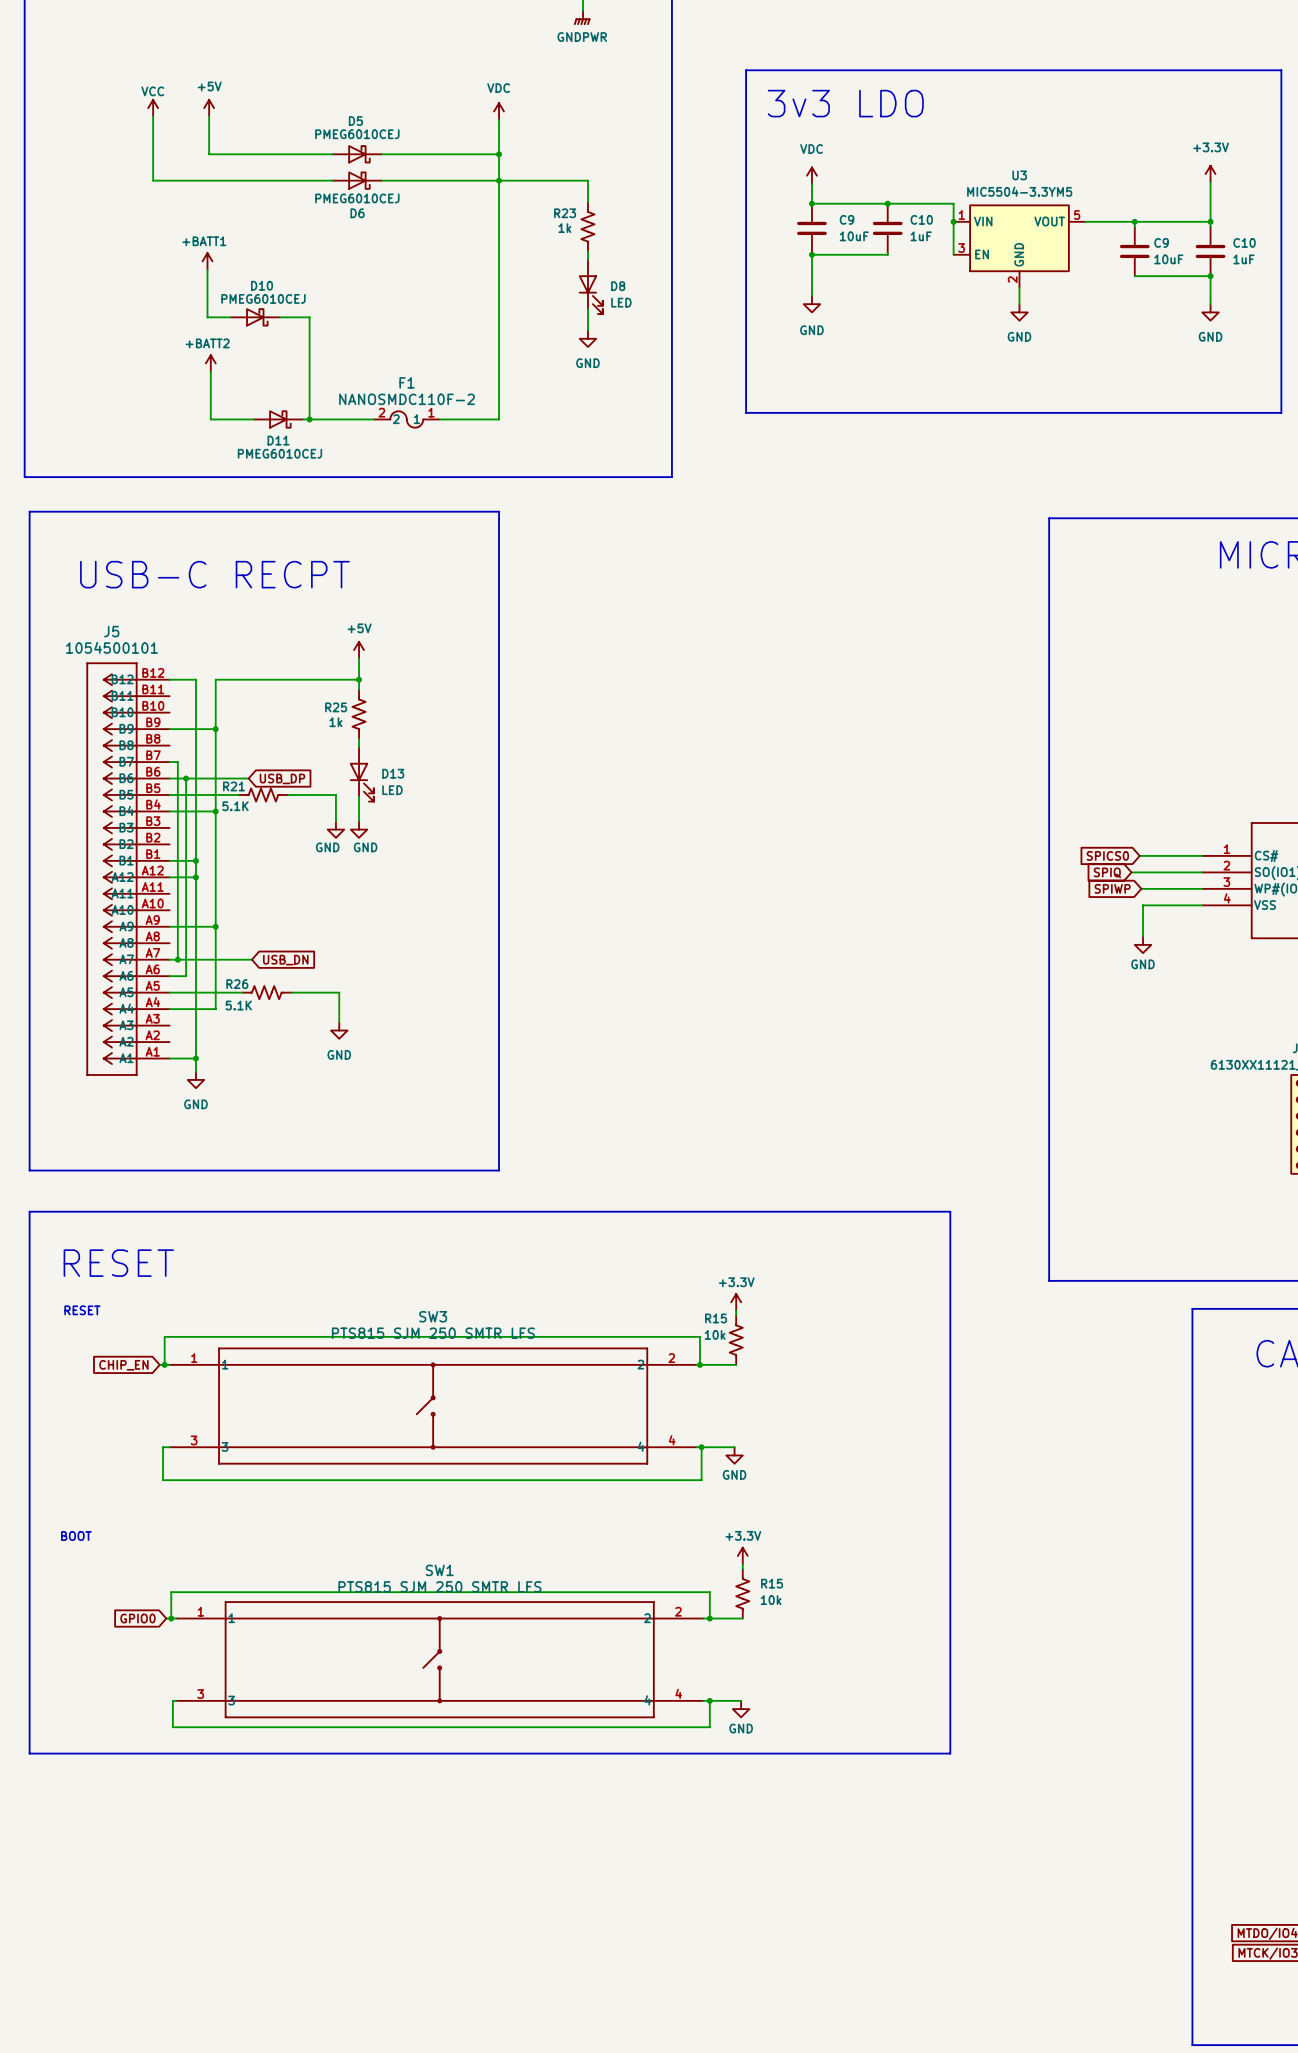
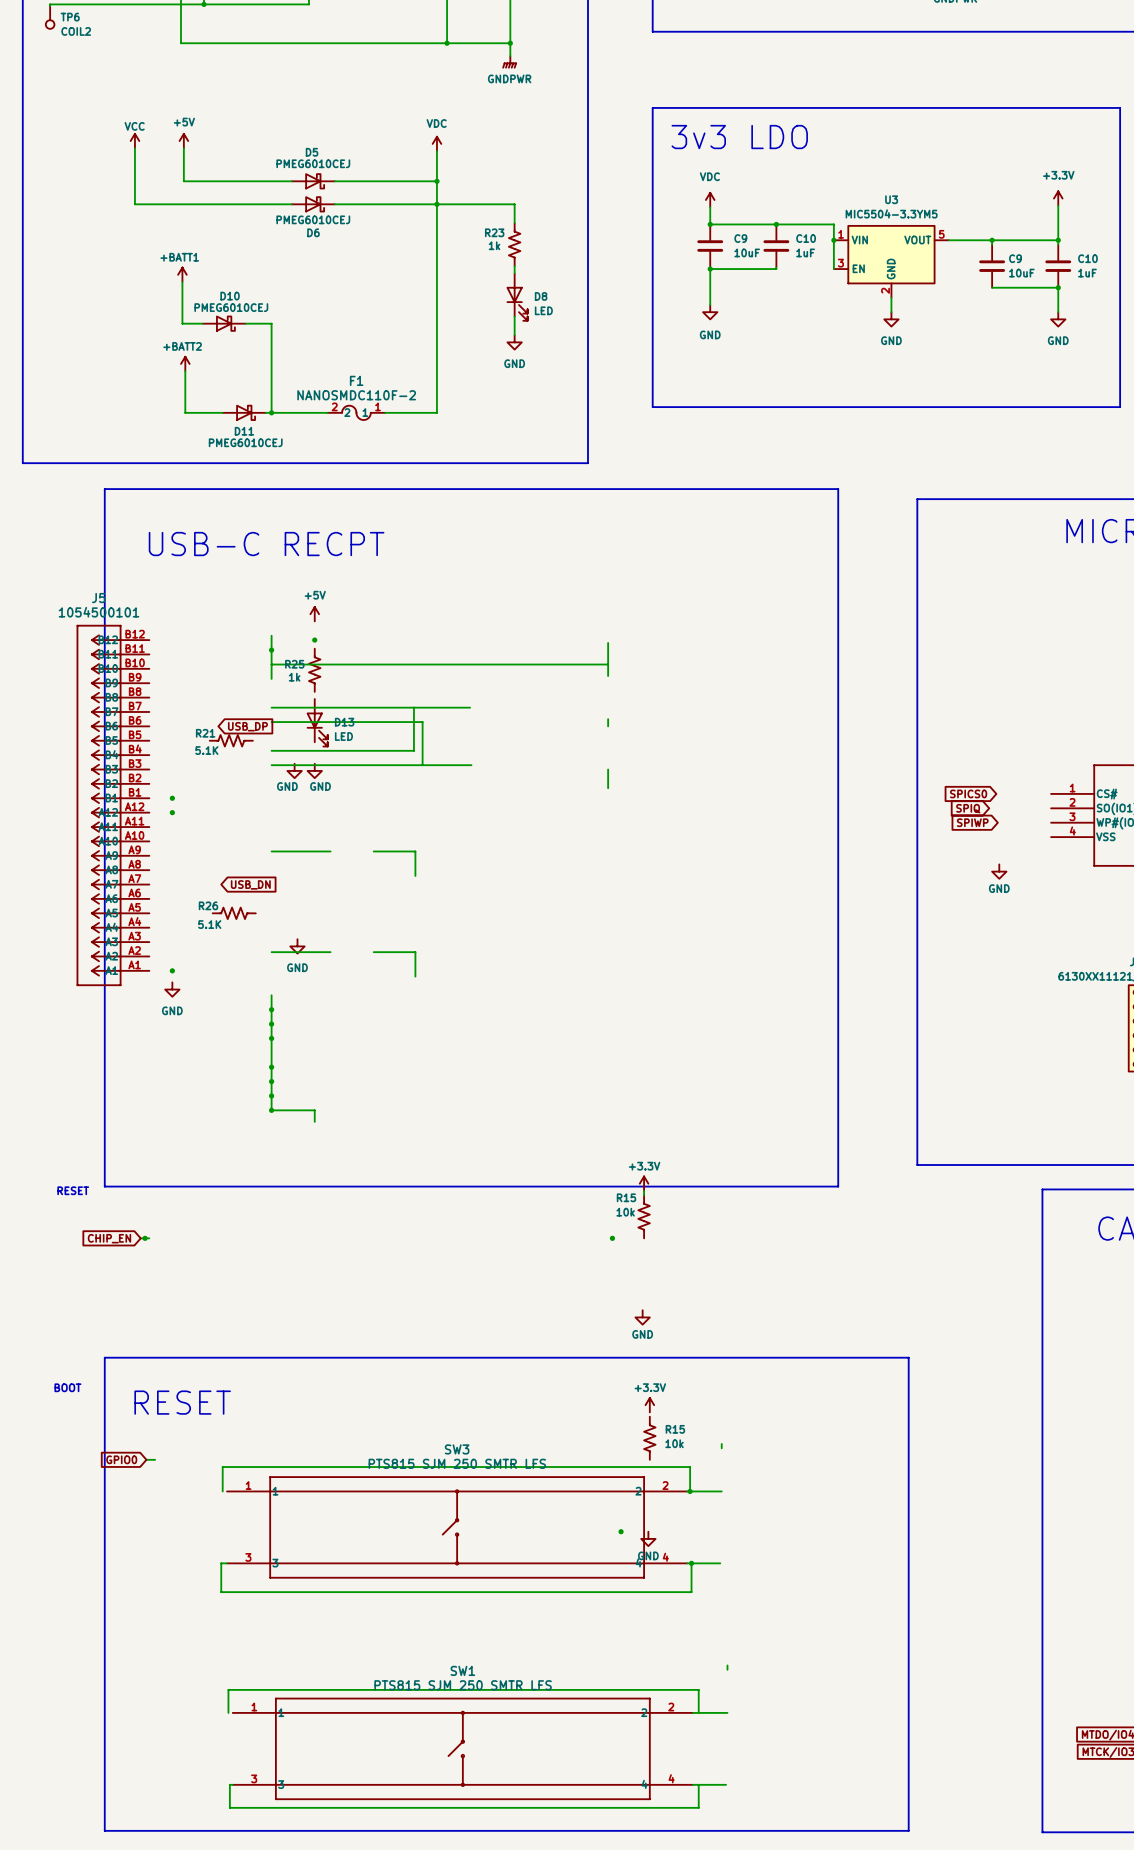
line: none -> (104, 489) (104, 1186) (838, 1186) (838, 489) (104, 489)
line: (29, 511) (29, 1170) (499, 1170) (499, 511) (29, 511) -> none
text position: USB-C RECPT (214, 574) -> USB-C RECPT (266, 544)
wire: (359, 658) (359, 689) -> none
wire: none -> (271, 635) (271, 678)
wire: (169, 679) (195, 679) (195, 1071) -> none
wire: (359, 679) (215, 679) (215, 1009) (169, 1009) -> none
wire: none -> (608, 642) (608, 676)
junction: none -> (271, 650)
wire: none -> (271, 664) (608, 664)
wire: (169, 729) (215, 729) -> none
junction: (215, 729) -> none
wire: (359, 739) (359, 747) -> none
wire: none -> (271, 707) (470, 707)
wire: none -> (413, 707) (413, 750) (271, 750)
wire: (169, 762) (177, 762) (177, 959) -> none
wire: none -> (608, 719) (608, 726)
wire: none -> (271, 722) (422, 722) (422, 765)
wire: (169, 778) (248, 778) -> none
wire: (186, 778) (186, 976) (169, 976) -> none
junction: (186, 778) -> none
wire: (169, 795) (238, 795) -> none
wire: (288, 795) (335, 795) (335, 821) -> none
wire: (359, 796) (359, 821) -> none
wire: (169, 811) (215, 811) -> none
junction: (215, 811) -> none
wire: none -> (271, 765) (471, 765)
wire: none -> (608, 769) (608, 788)
wire: (1139, 855) (1202, 855) -> none
wire: (169, 860) (195, 860) -> none
wire: (1131, 872) (1202, 872) -> none
wire: (169, 877) (195, 877) -> none
wire: (1141, 888) (1202, 888) -> none
wire: (1202, 905) (1143, 905) (1143, 936) -> none
wire: none -> (271, 851) (330, 851)
wire: none -> (373, 851) (415, 851) (415, 875)
wire: (169, 926) (215, 926) -> none
junction: (215, 926) -> none
wire: (169, 959) (251, 959) -> none
junction: (177, 959) -> none
wire: (169, 992) (242, 992) -> none
wire: (291, 992) (339, 992) (339, 1022) -> none
wire: none -> (271, 952) (330, 952)
wire: none -> (373, 952) (415, 952) (415, 976)
wire: (169, 1058) (195, 1058) -> none
wire: none -> (271, 995) (271, 1110) (314, 1110) (314, 1121)
junction: none -> (271, 1009)
junction: none -> (271, 1024)
junction: none -> (271, 1038)
junction: none -> (271, 1067)
junction: none -> (271, 1081)
junction: none -> (271, 1095)
line: (29, 1211) (950, 1211) (950, 1753) (29, 1753) (29, 1211) -> none
junction: none -> (271, 1110)
text: RESET (118, 1263) -> none
wire: (164, 1364) (164, 1336) (699, 1336) (699, 1364) -> none
wire: (696, 1364) (736, 1364) -> none
SW3 position: (433, 1406) -> (457, 1527)
wire: (169, 1447) (163, 1447) (163, 1480) (701, 1480) (701, 1447) -> none
wire: (696, 1447) (734, 1447) -> none
junction: (701, 1447) -> none
line: none -> (104, 1357) (908, 1357) (908, 1830) (104, 1830) (104, 1357)
text: none -> RESET (182, 1402)
wire: (742, 1564) (742, 1569) -> (721, 1444) (721, 1448)
wire: (171, 1618) (171, 1592) (709, 1592) (709, 1618) -> none
junction: (171, 1618) -> none
wire: (703, 1618) (742, 1618) -> (687, 1491) (721, 1491)
junction: (709, 1618) -> none
wire: none -> (222, 1491) (222, 1467) (690, 1467) (690, 1491)
junction: none -> (690, 1491)
SW1 position: (439, 1659) -> (462, 1748)
wire: (176, 1700) (172, 1700) (172, 1727) (709, 1727) (709, 1700) -> none
wire: (703, 1700) (741, 1700) -> (687, 1563) (720, 1563)
wire: none -> (227, 1563) (221, 1563) (221, 1592) (691, 1592) (691, 1563)
junction: none -> (691, 1563)
wire: none -> (727, 1665) (727, 1669)
wire: none -> (228, 1712) (228, 1689) (698, 1689) (698, 1712)
wire: none -> (692, 1712) (727, 1712)
wire: none -> (232, 1784) (229, 1784) (229, 1807) (698, 1807) (698, 1784)
wire: none -> (692, 1784) (726, 1784)

